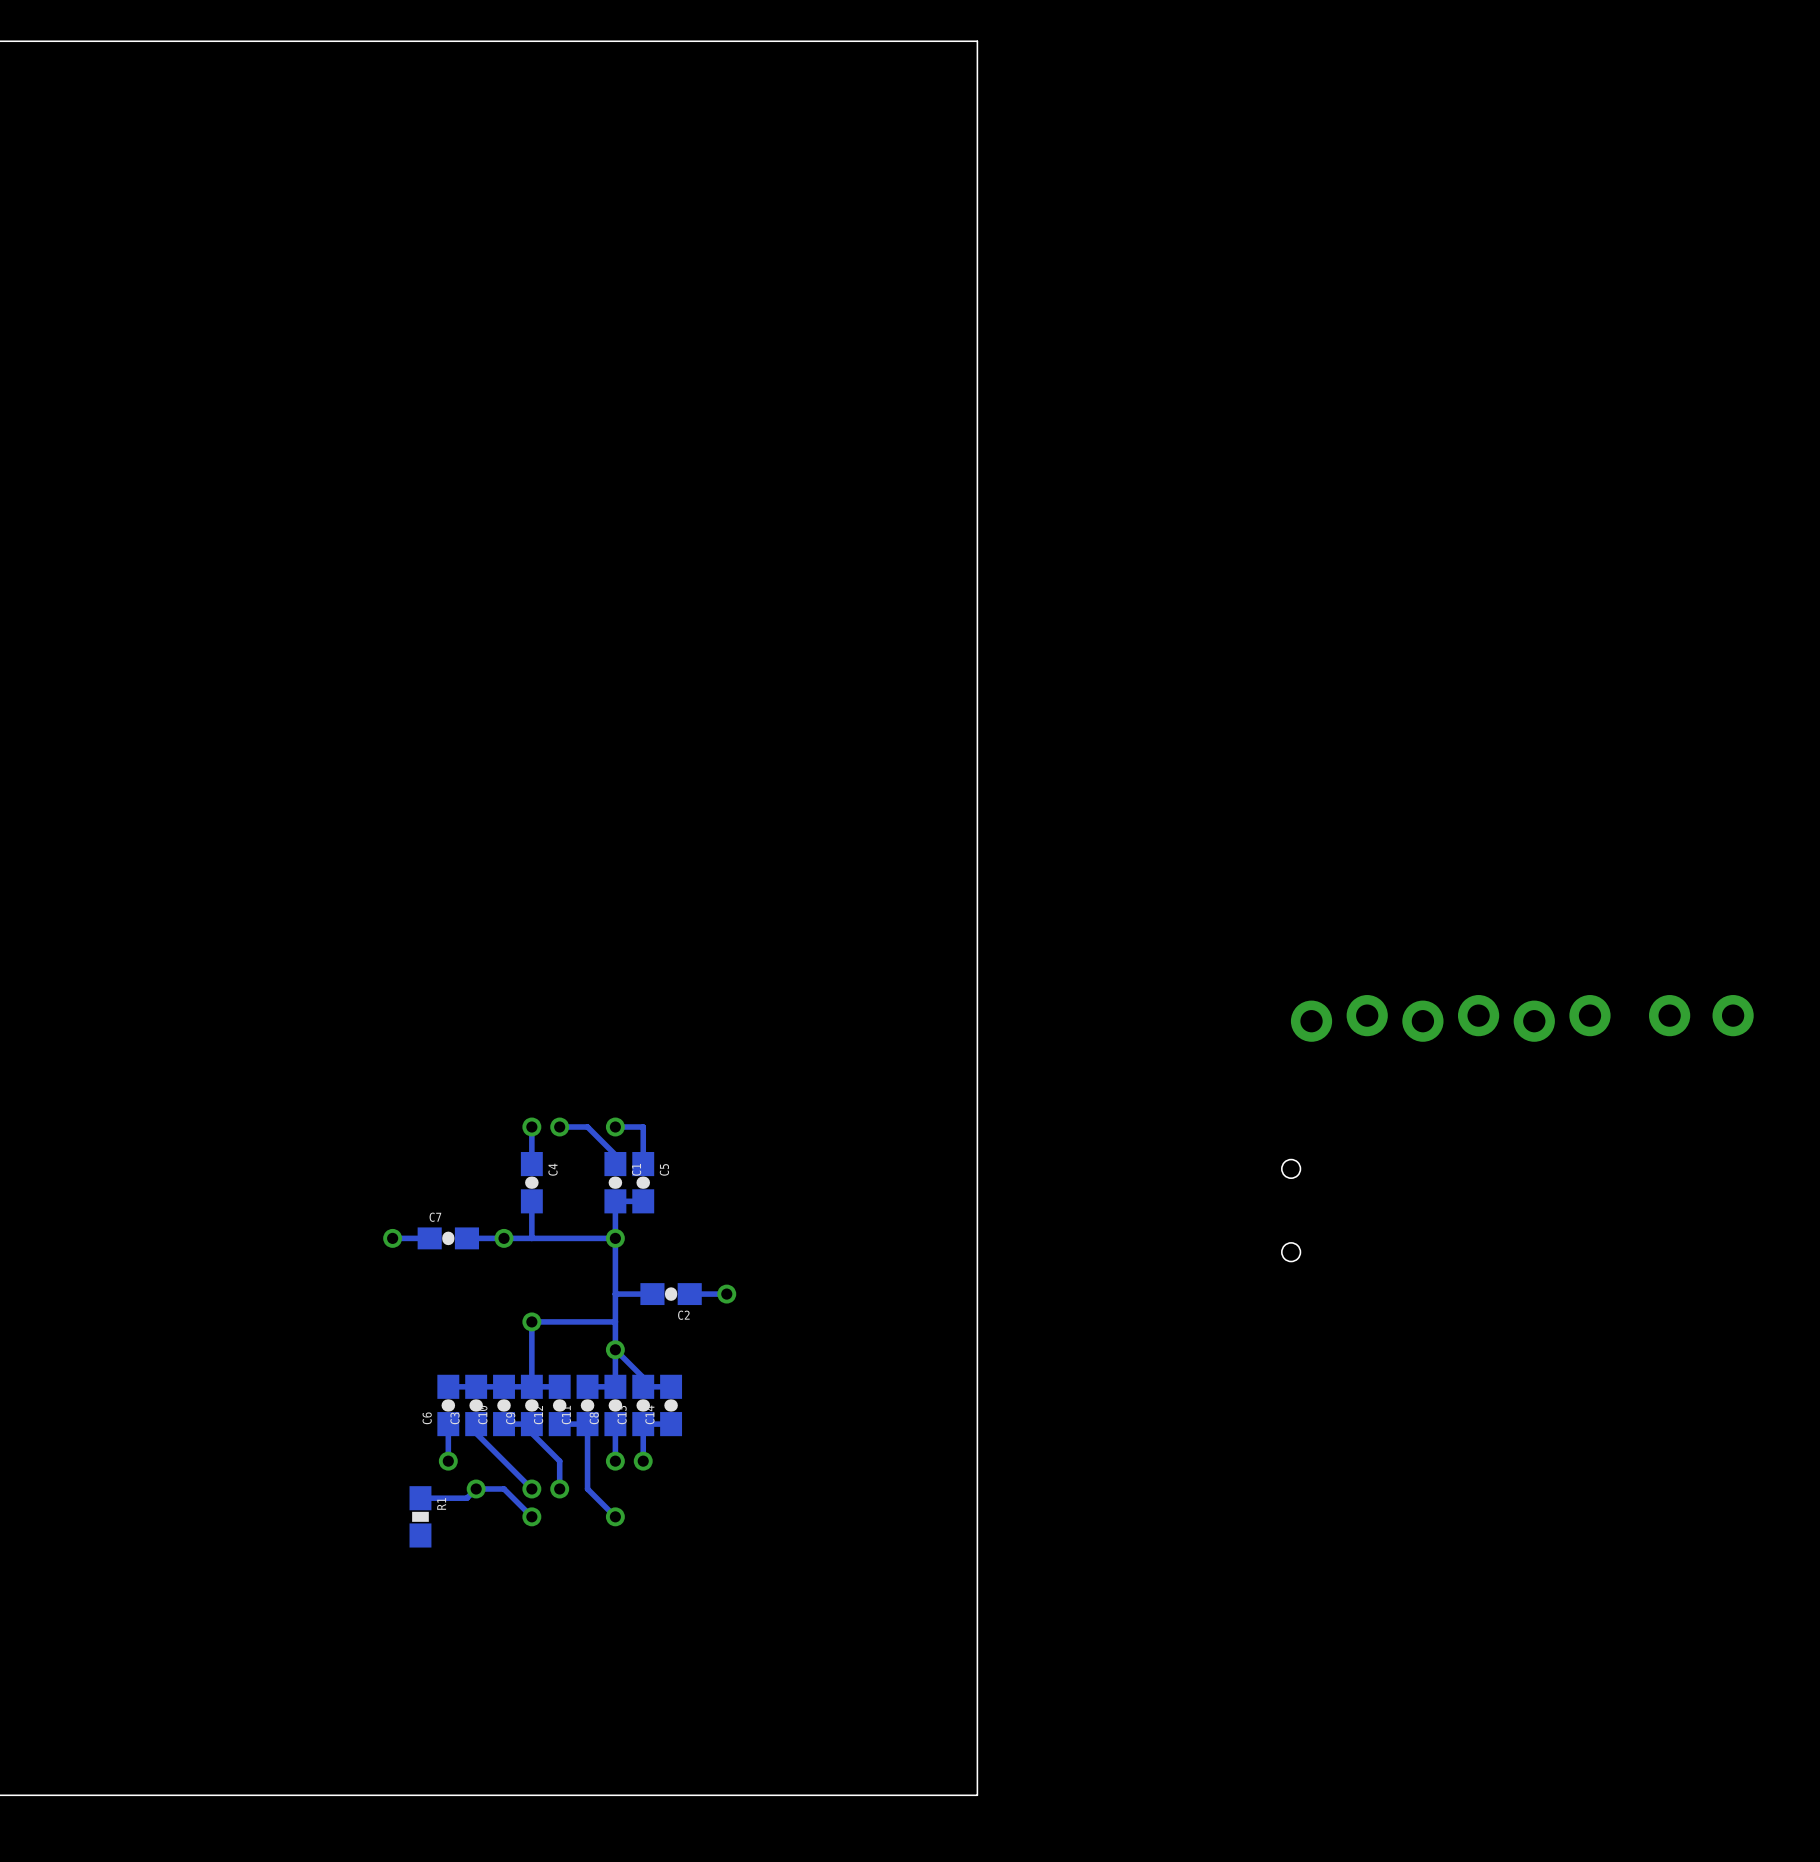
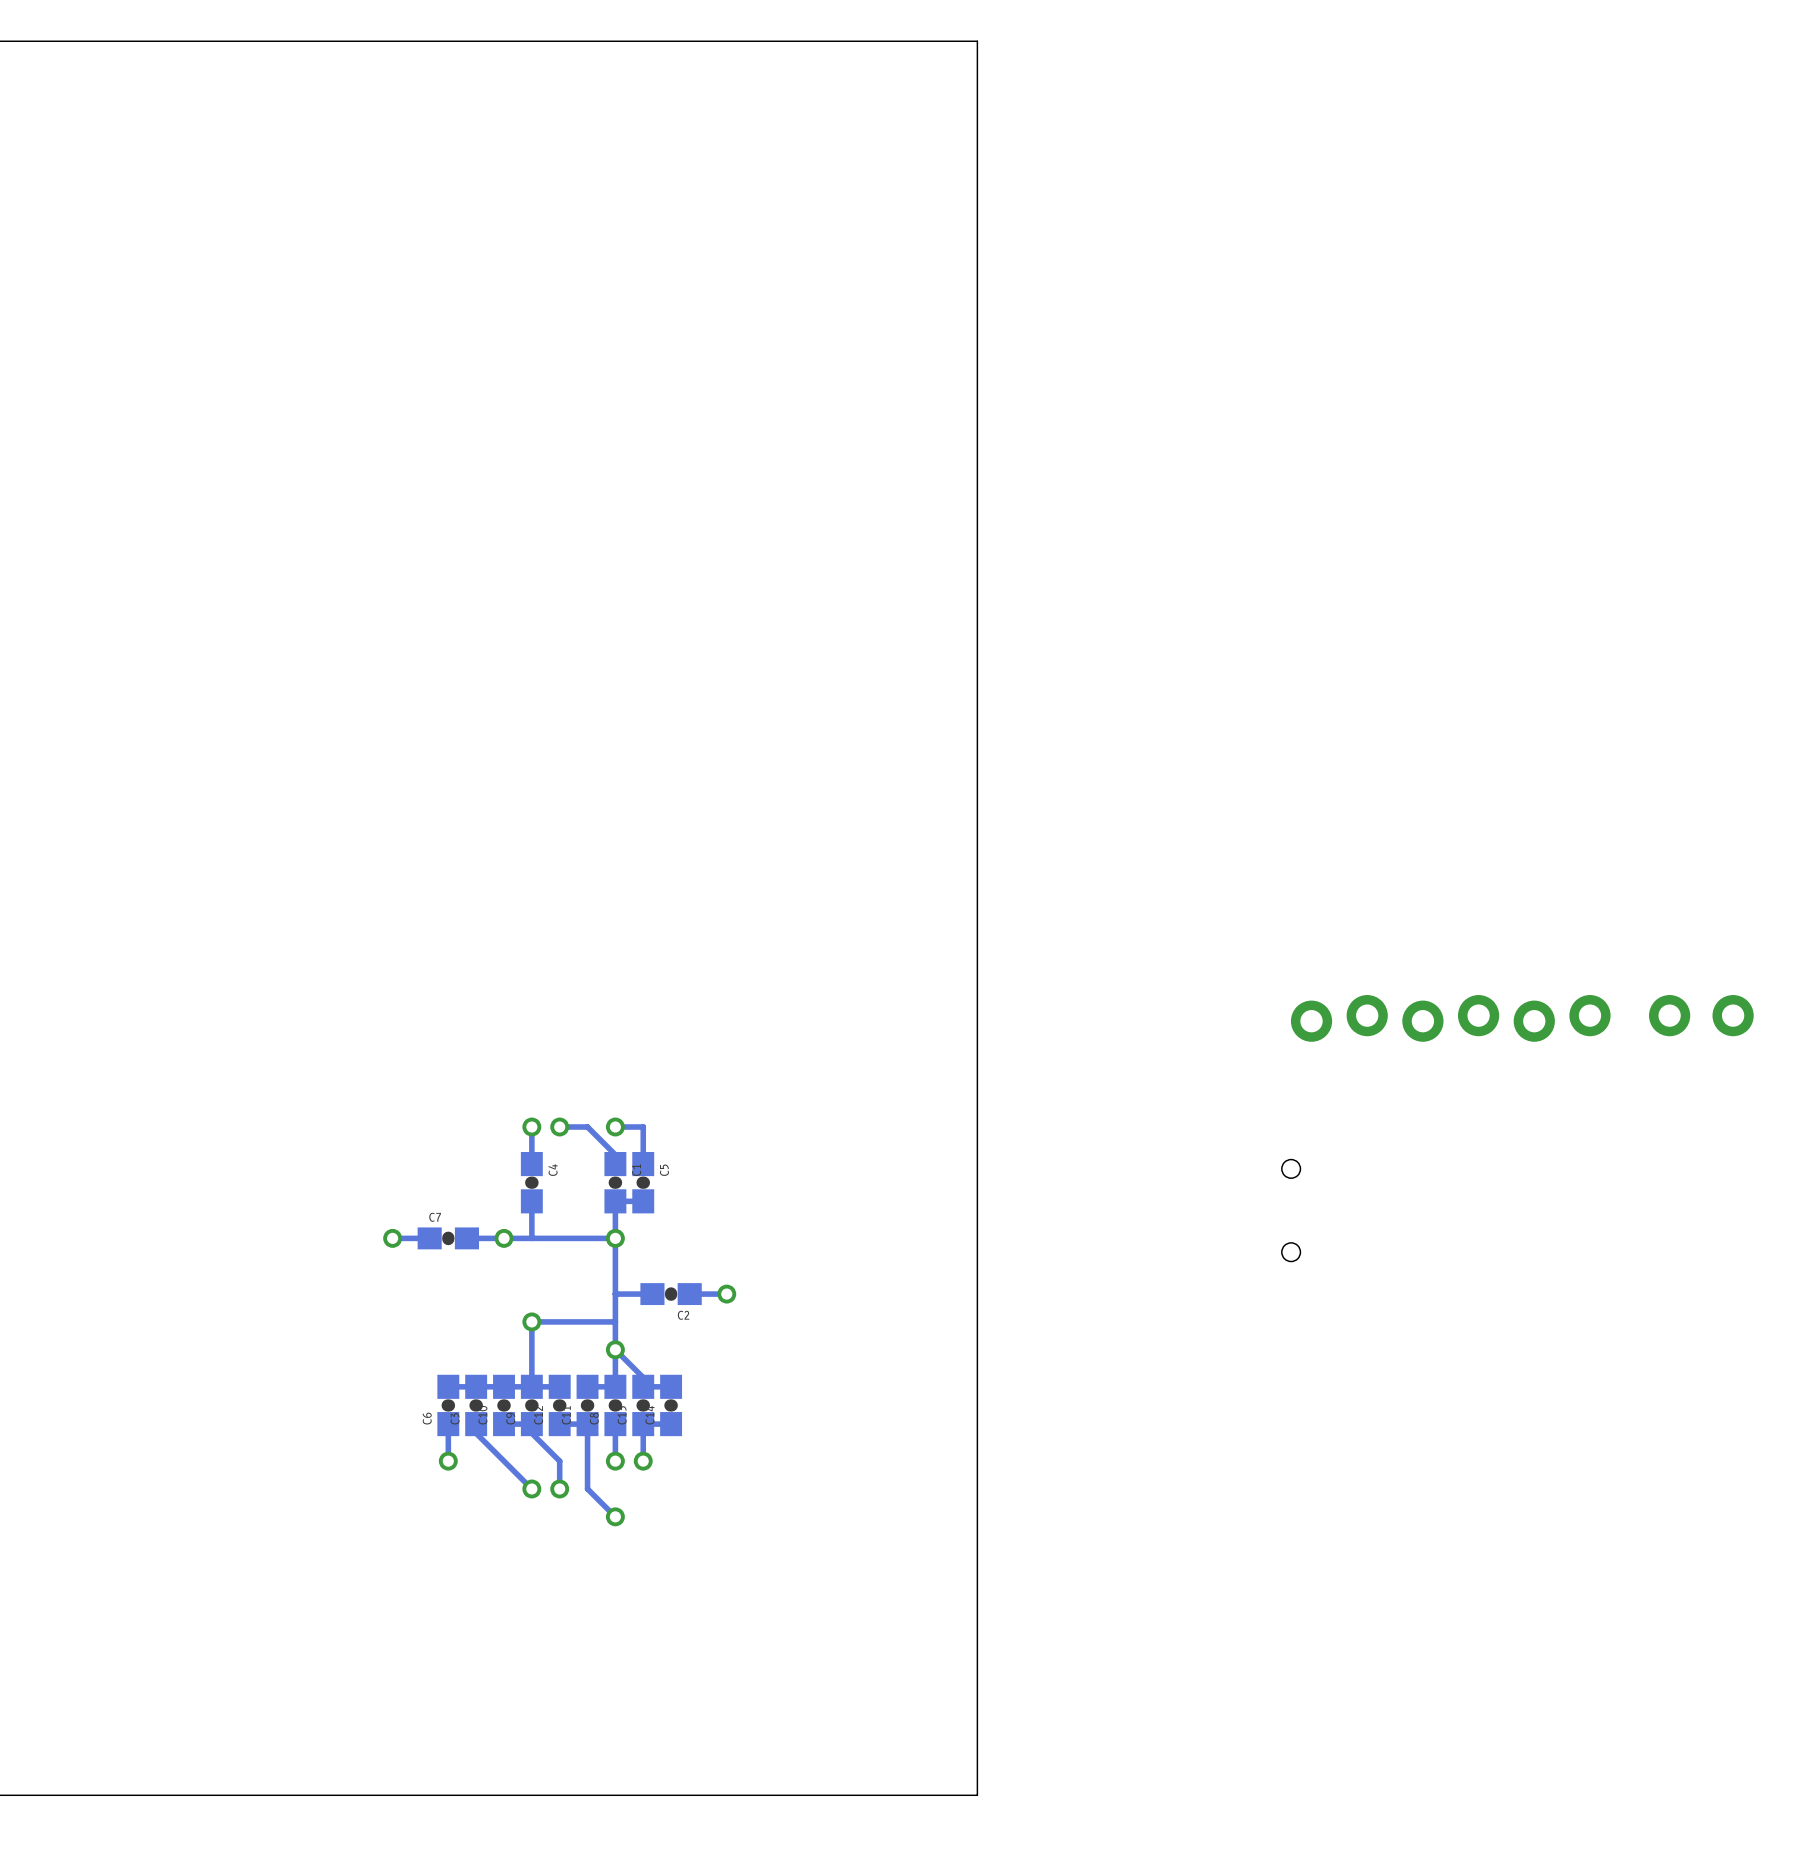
via: (476, 1488) -> none
track: (420, 1498) (466, 1498) (476, 1488) (504, 1488) (531, 1516) -> none
R1: (420, 1516) -> none
via: (531, 1516) -> none

